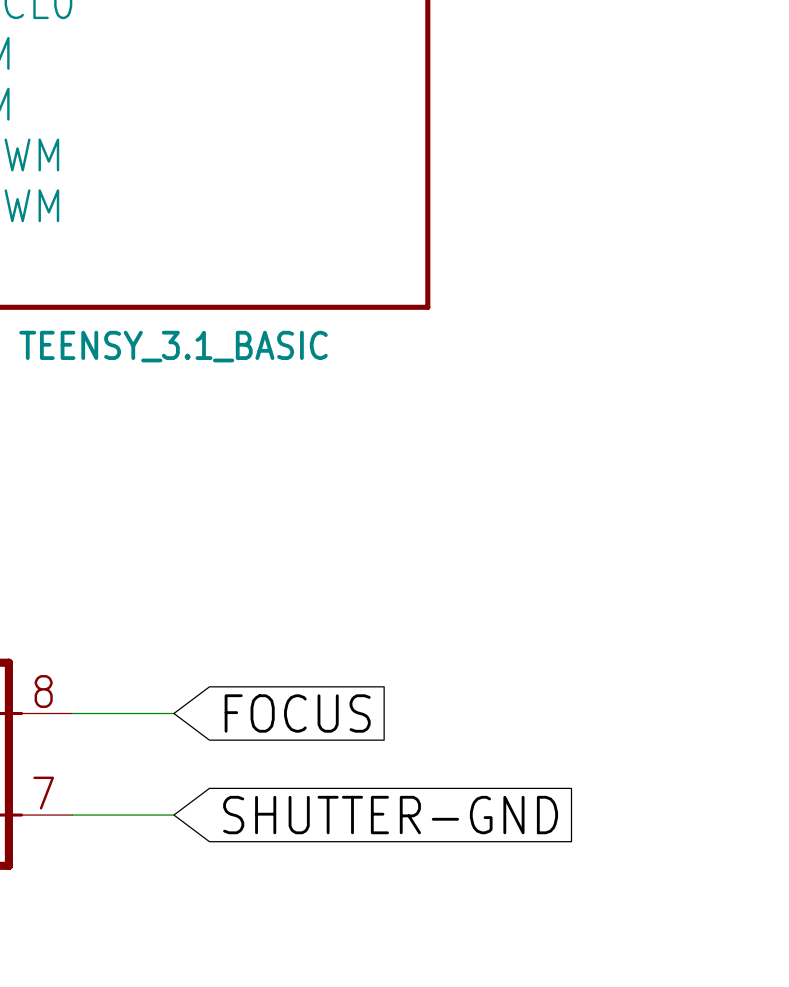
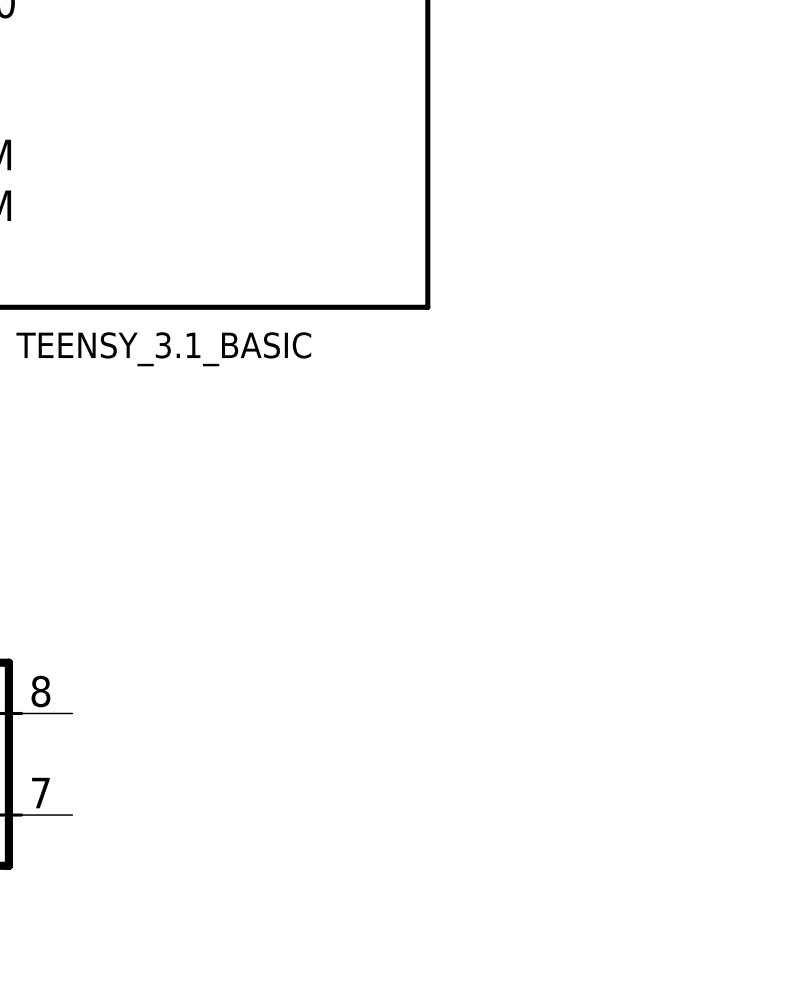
wire: (72, 713) (173, 713) -> none
global label: FOCUS (297, 713) -> none
wire: (72, 815) (173, 815) -> none
global label: SHUTTER-GND (390, 815) -> none

